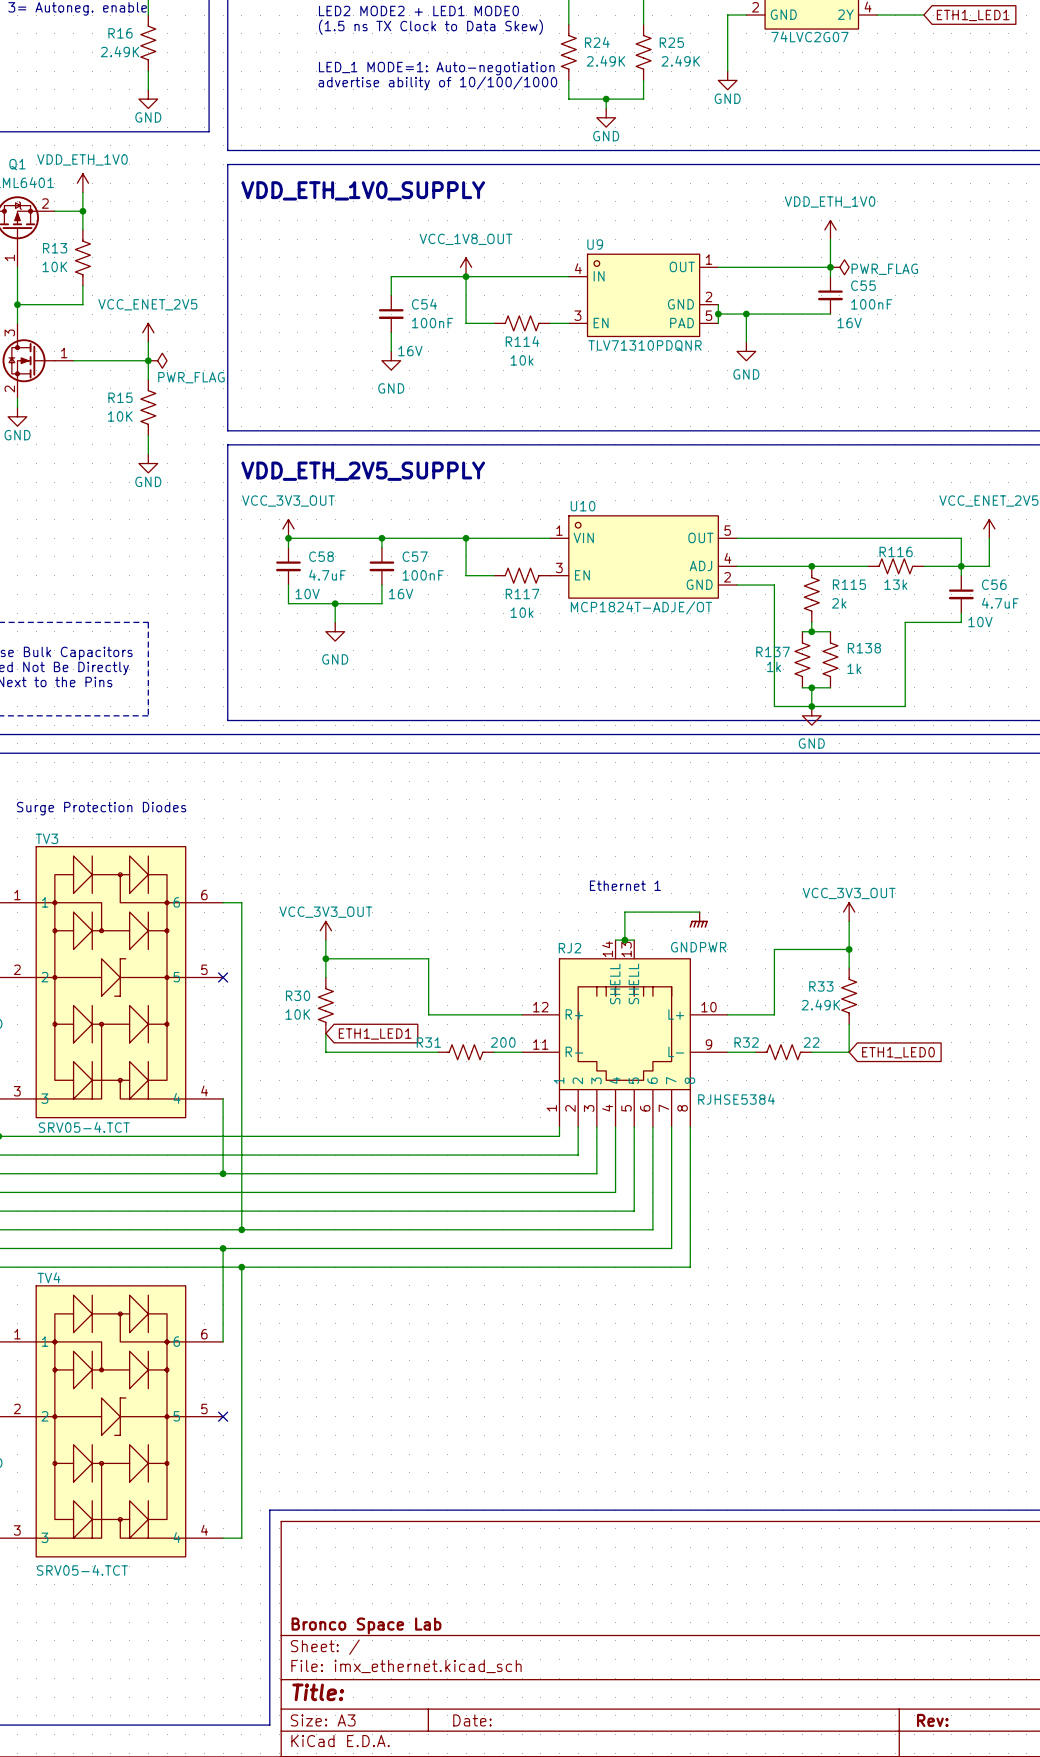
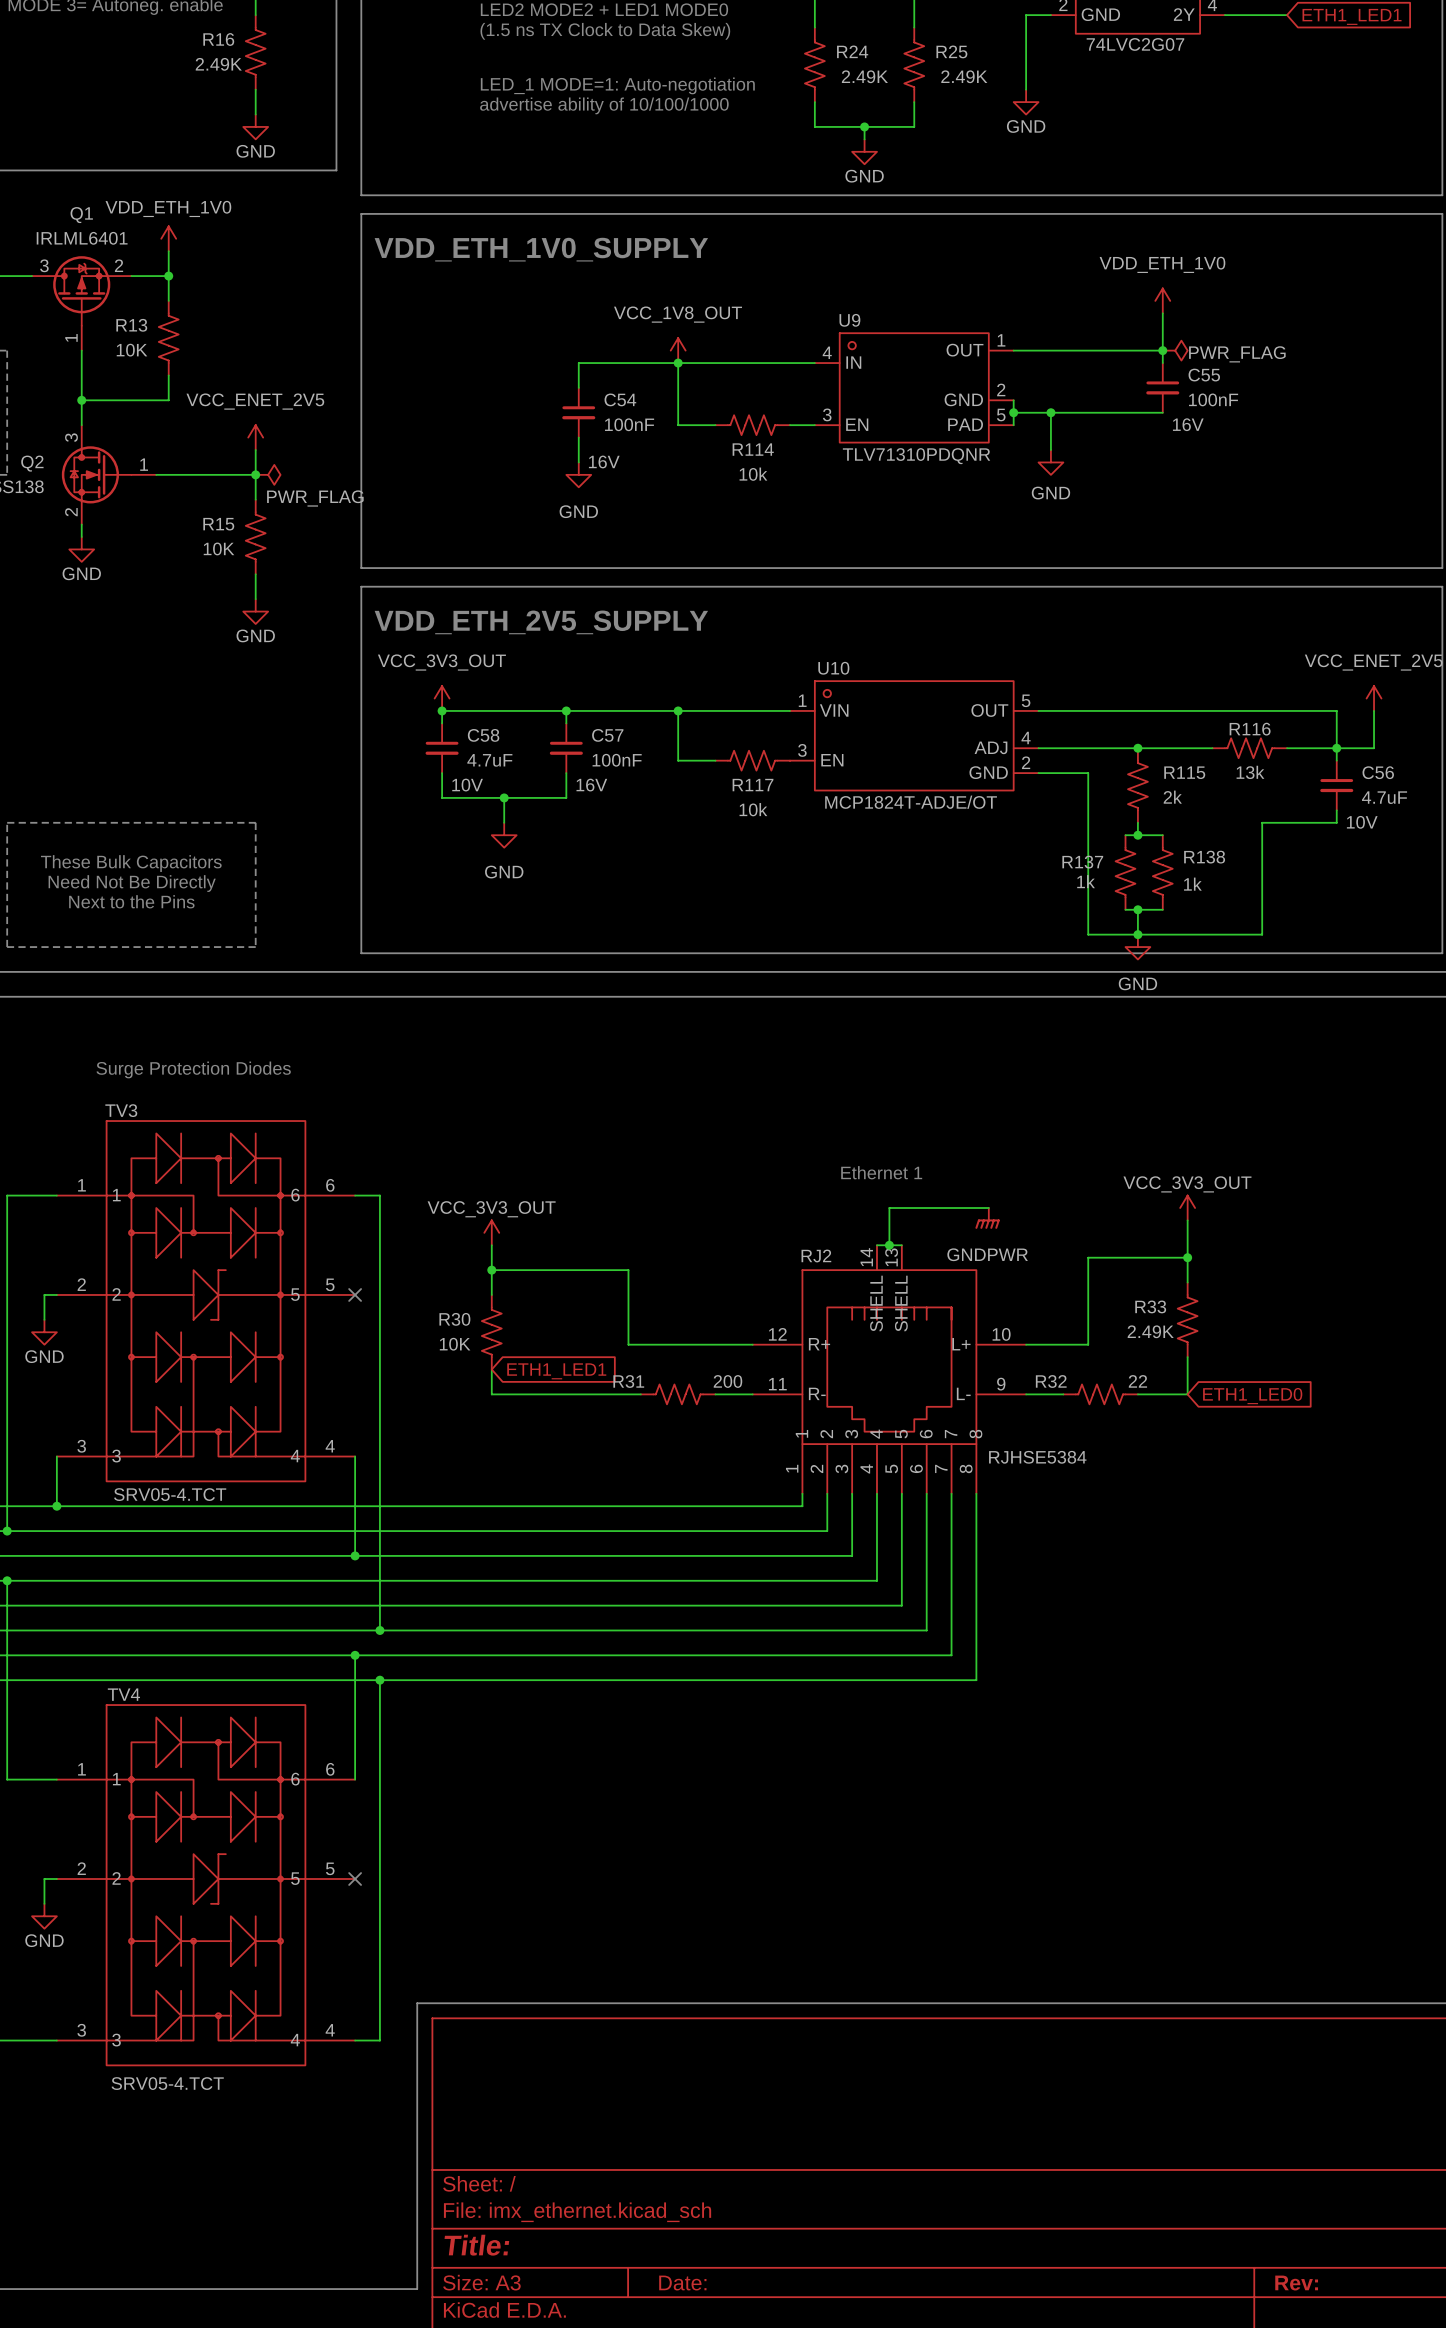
title block: Bronco Space Lab (366, 1625) -> none

